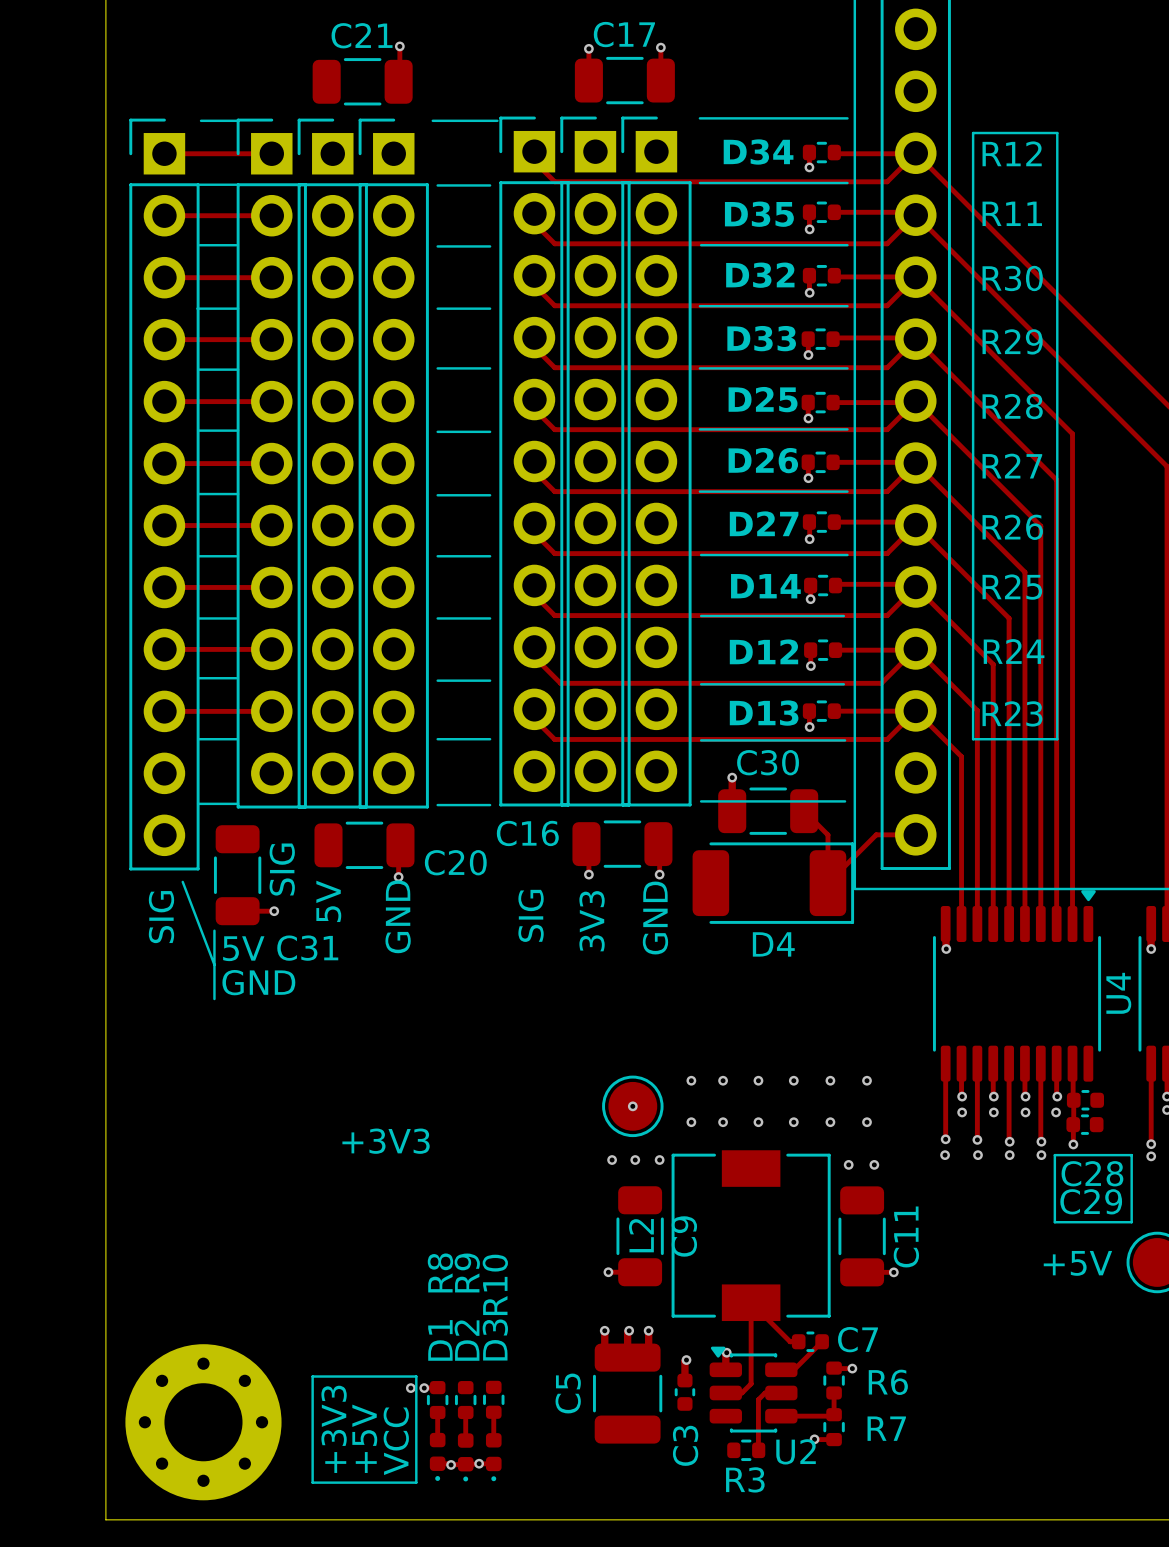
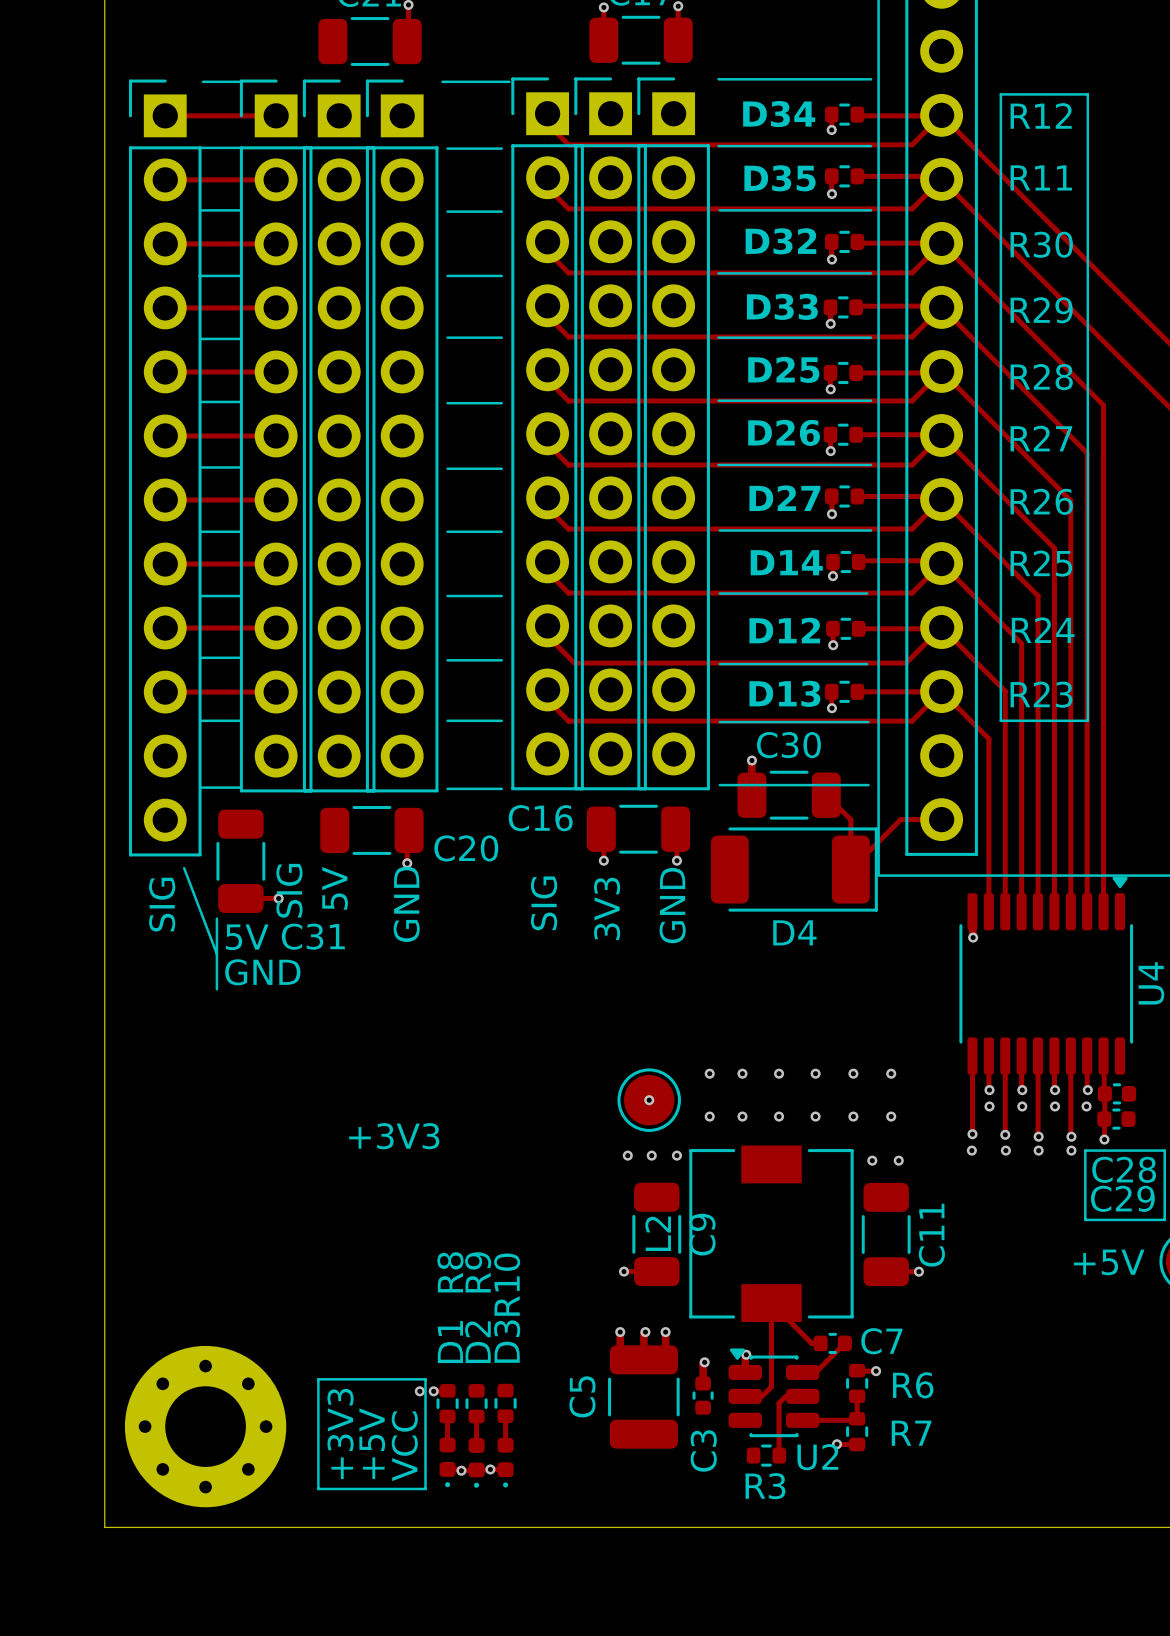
text position: SIG (282, 869) -> SIG (289, 890)

